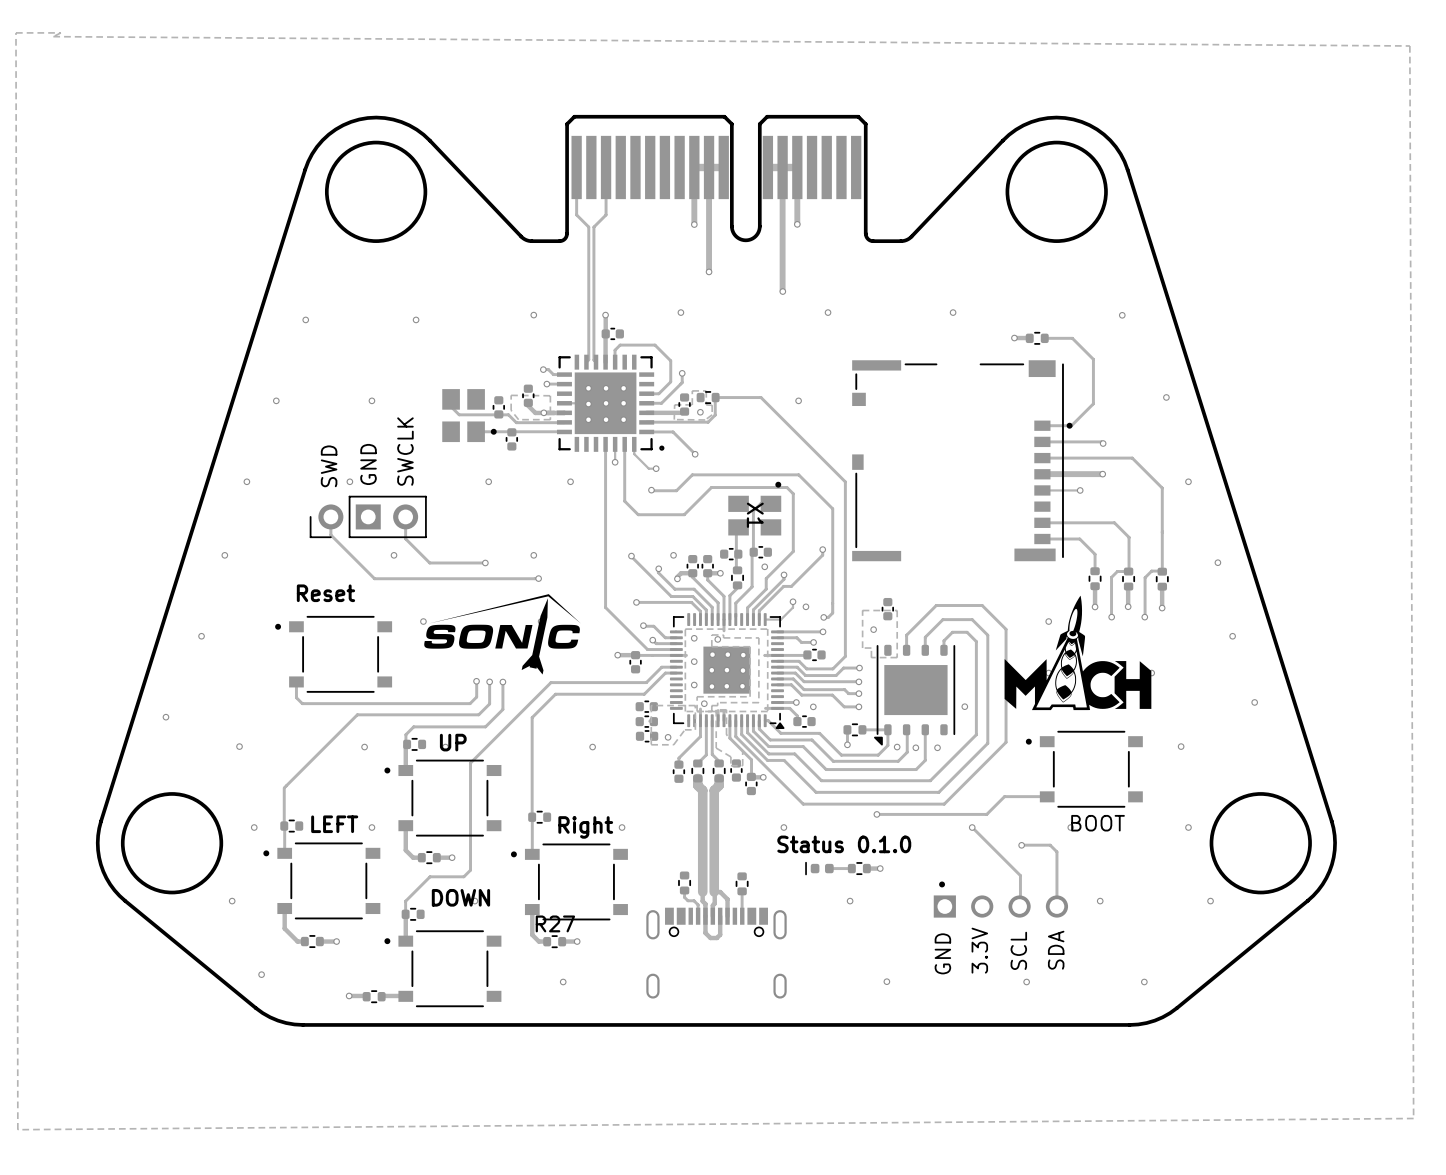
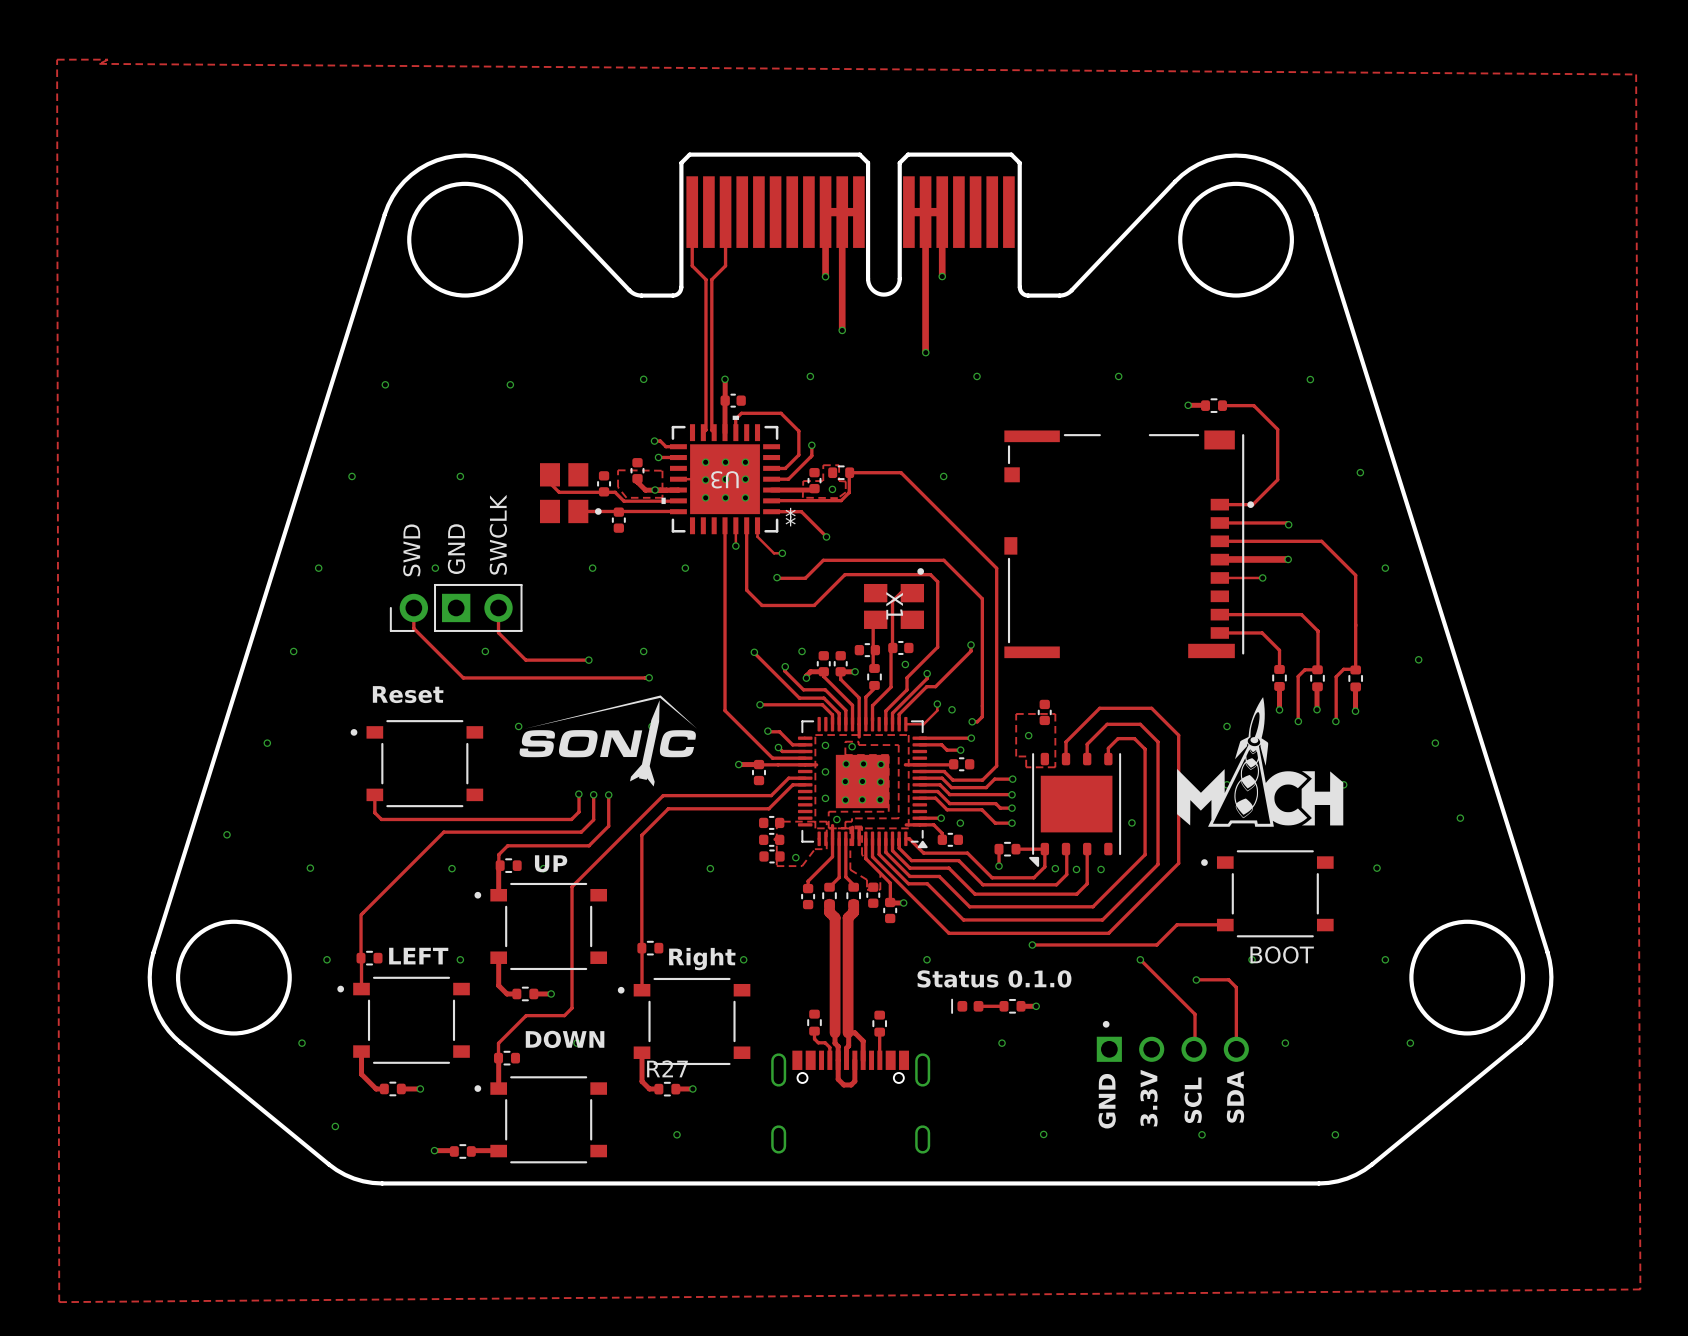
U3: none -> (720, 474)
part: (610, 403) -> none

